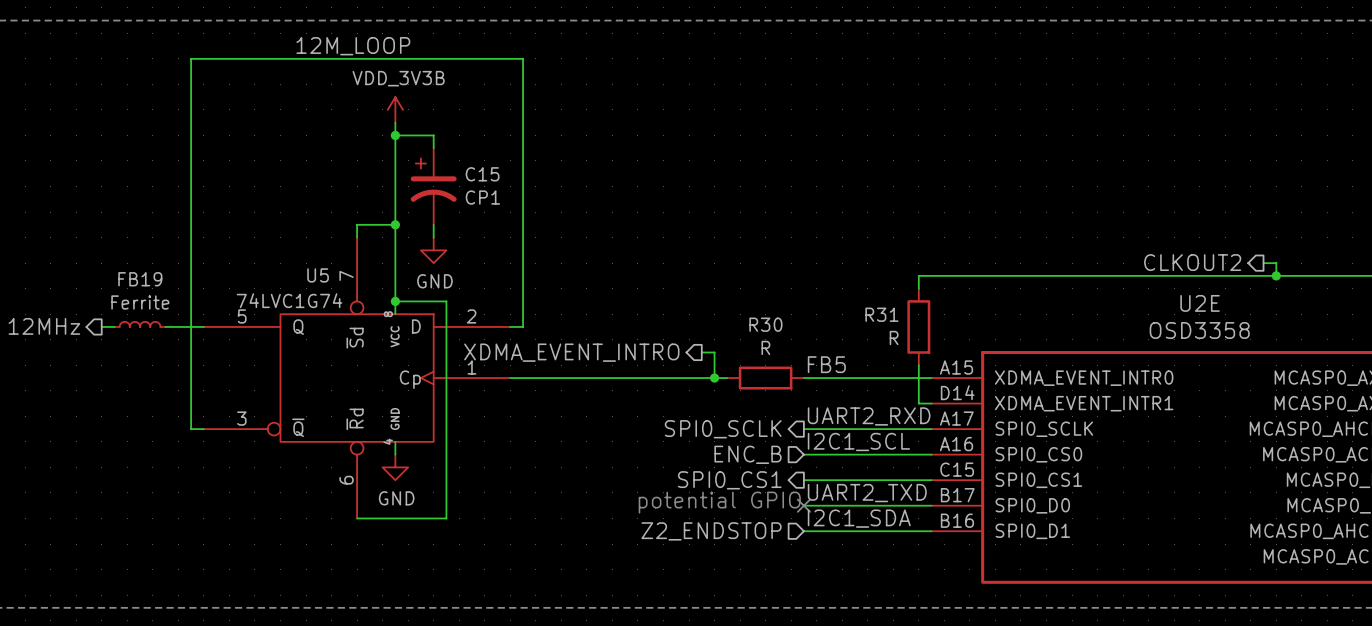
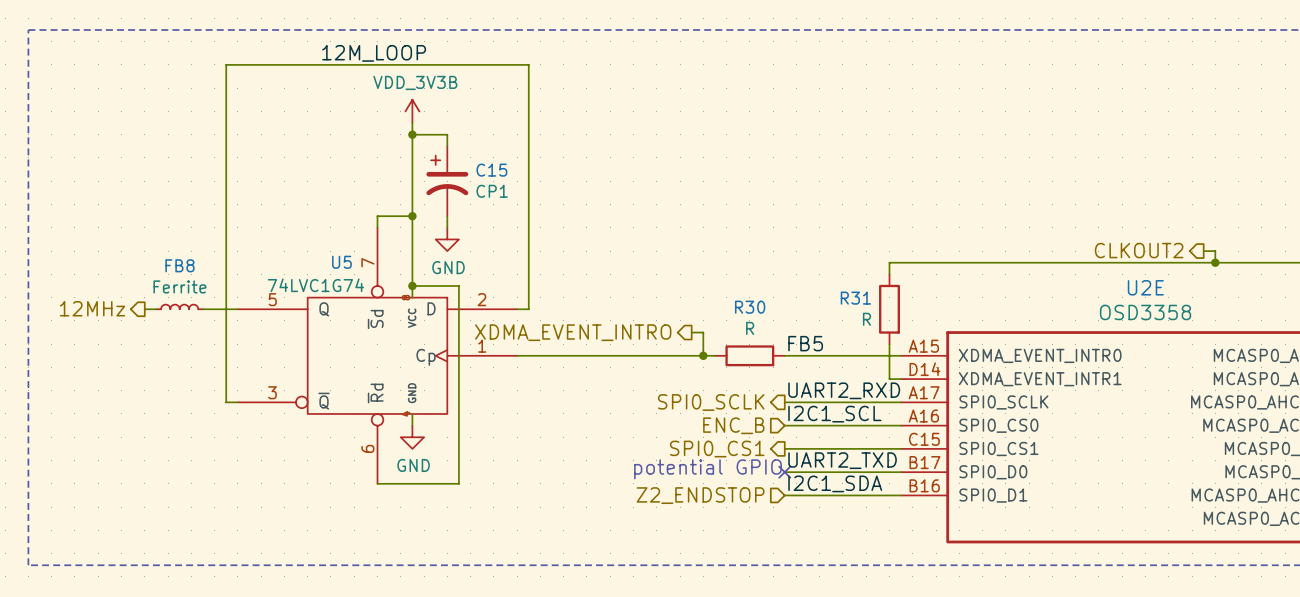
FB19 name: FB19 (140, 279) -> FB8 (179, 265)

